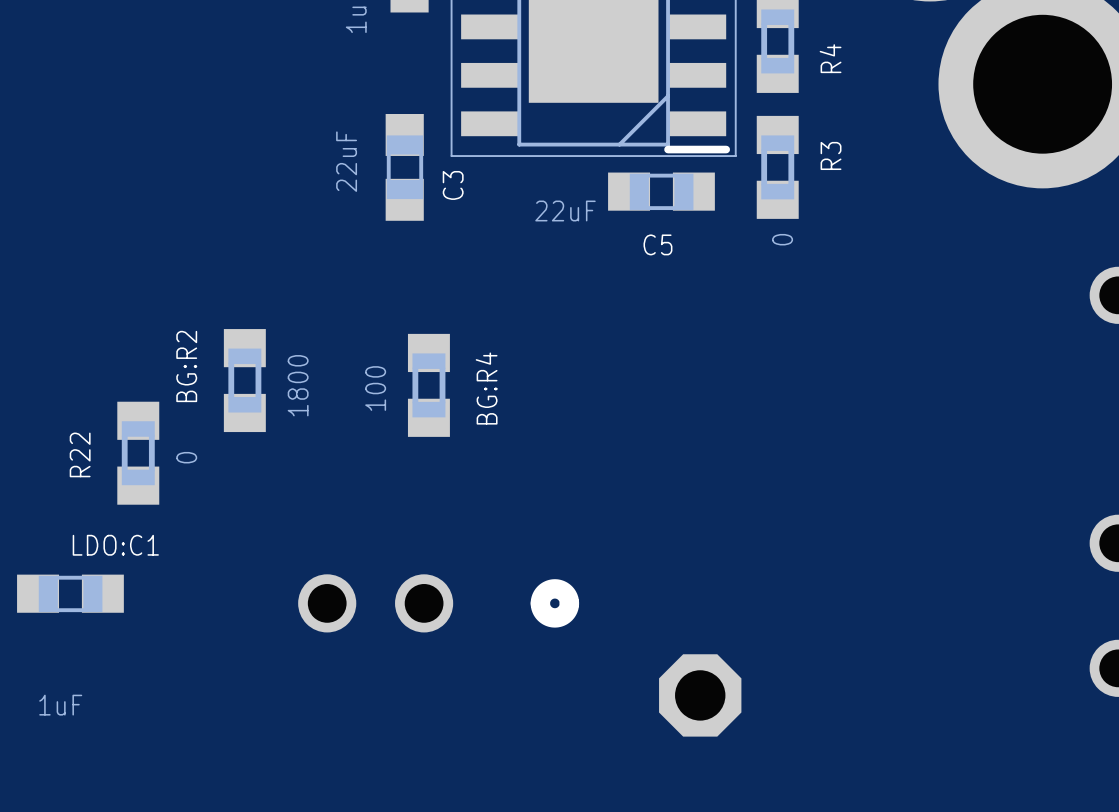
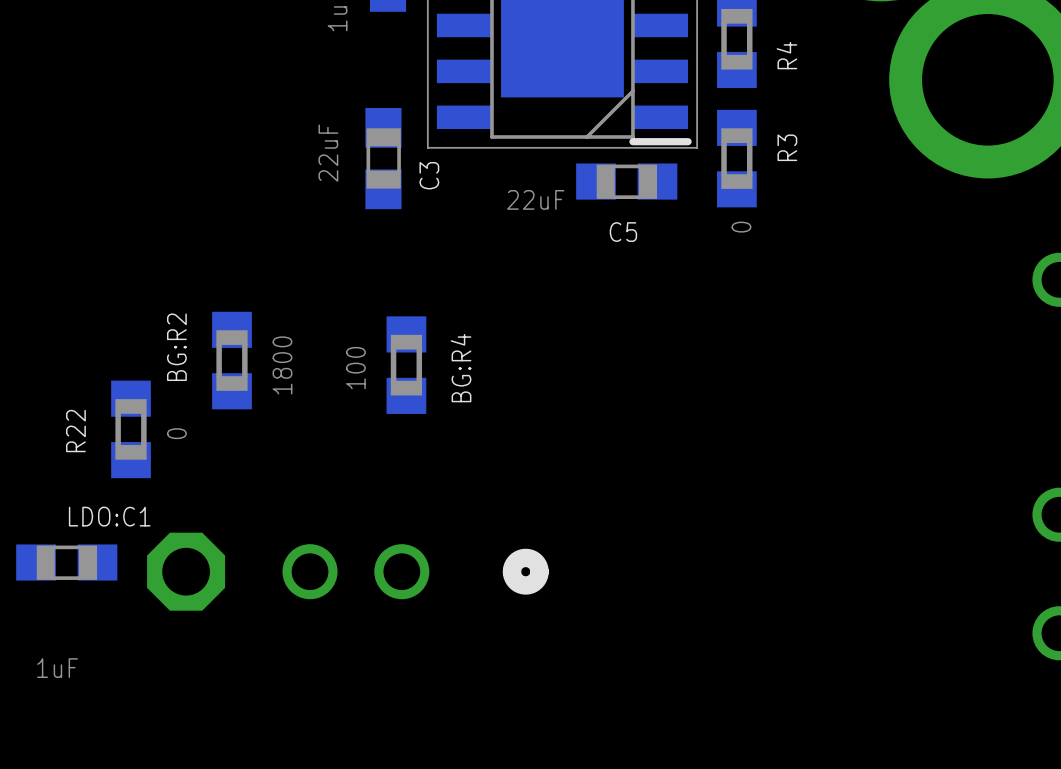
part position: (700, 695) -> (186, 571)

